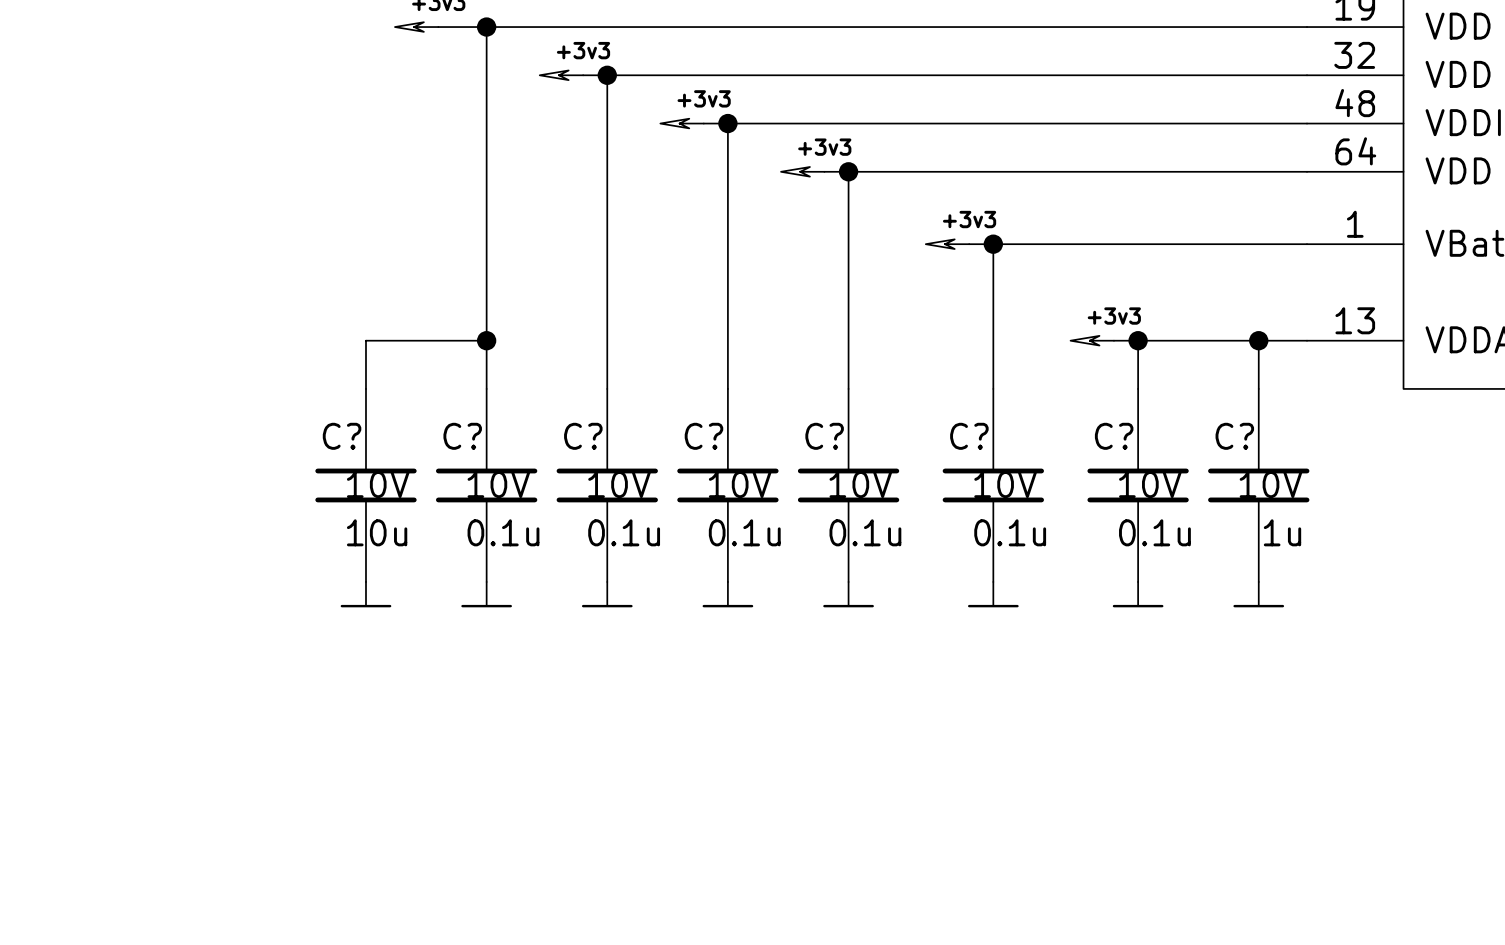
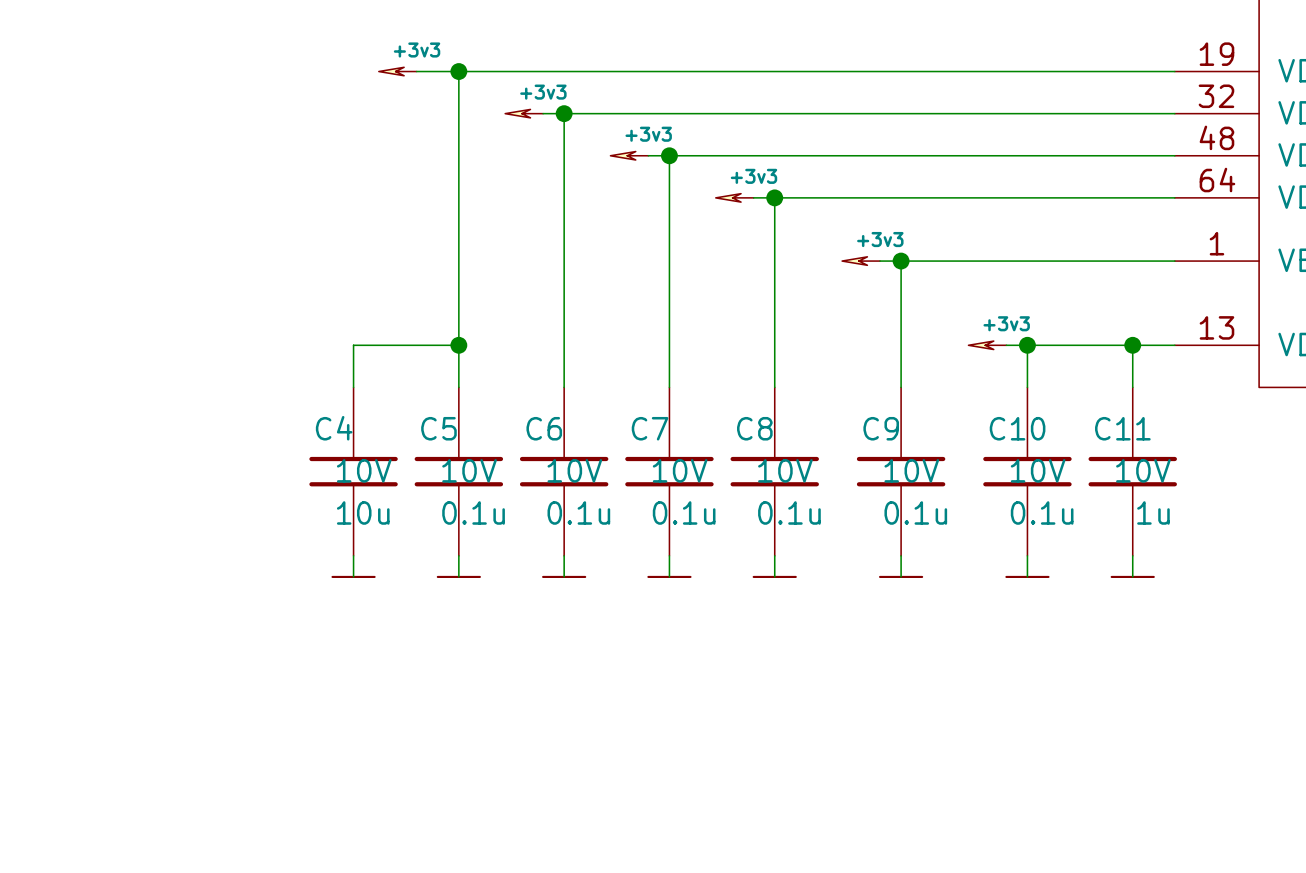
C? name: C? (342, 436) -> C4 (334, 428)
C? name: C? (462, 436) -> C5 (438, 428)
C? name: C? (583, 436) -> C6 (544, 428)
C? name: C? (703, 436) -> C7 (650, 428)
C? name: C? (824, 436) -> C8 (754, 428)
C? name: C? (969, 436) -> C9 (881, 428)
C? name: C? (1114, 436) -> C10 (1017, 428)
C? name: C? (1234, 436) -> C11 (1122, 428)

